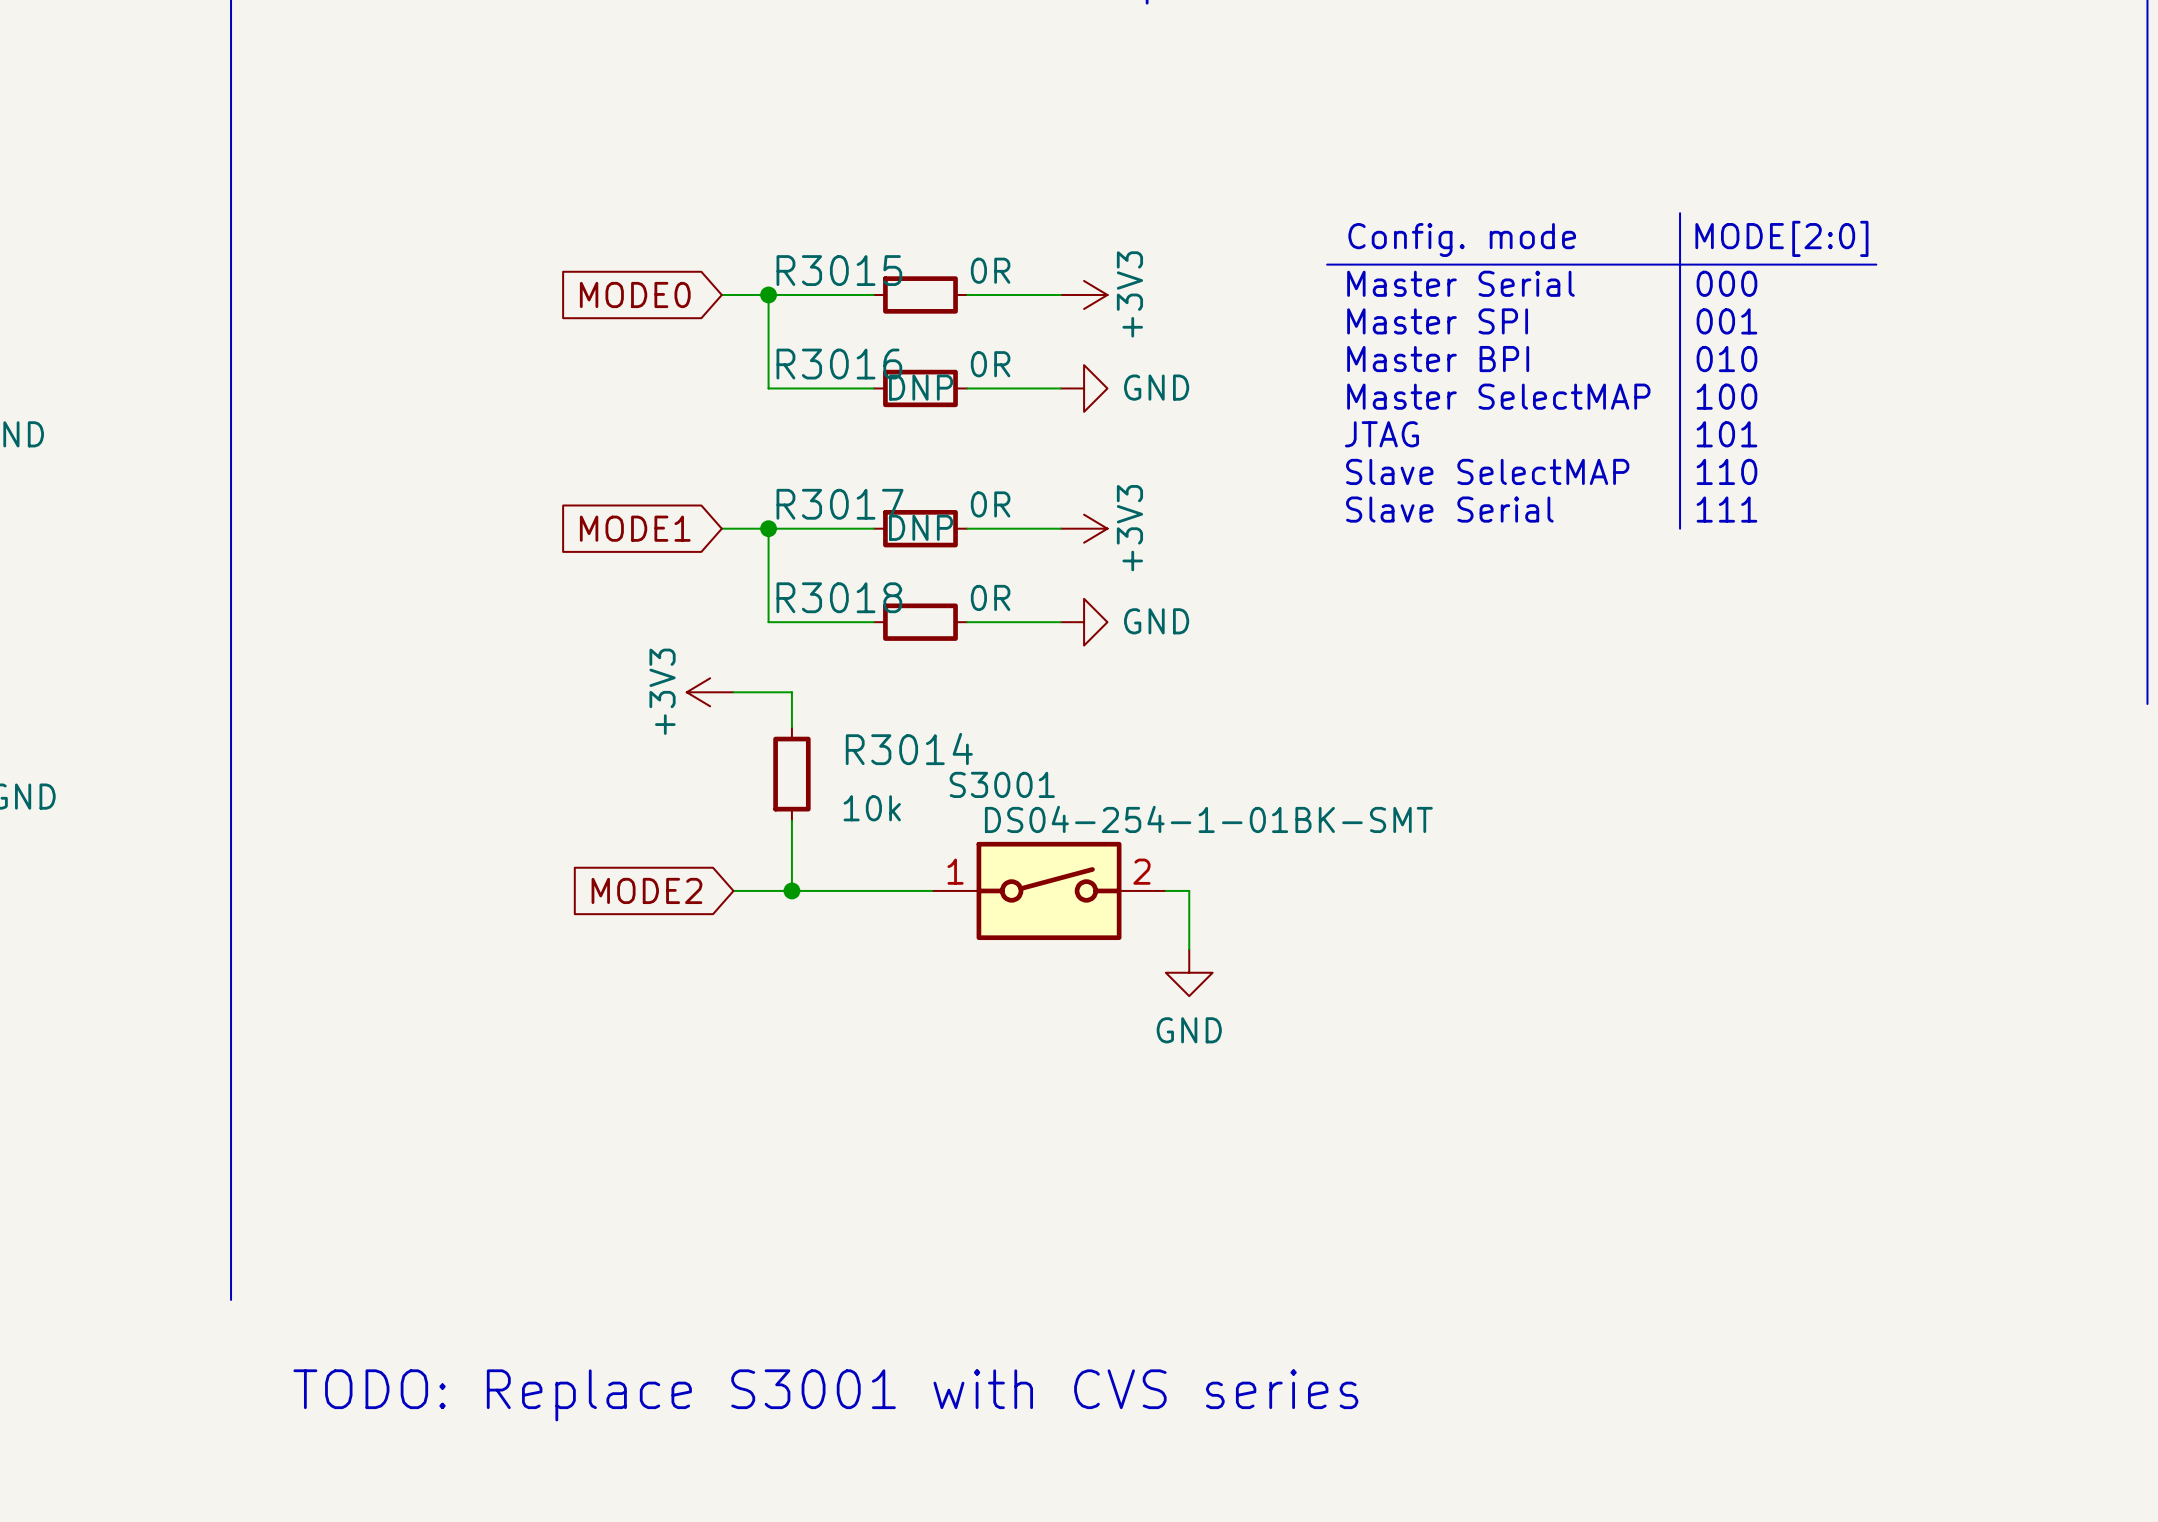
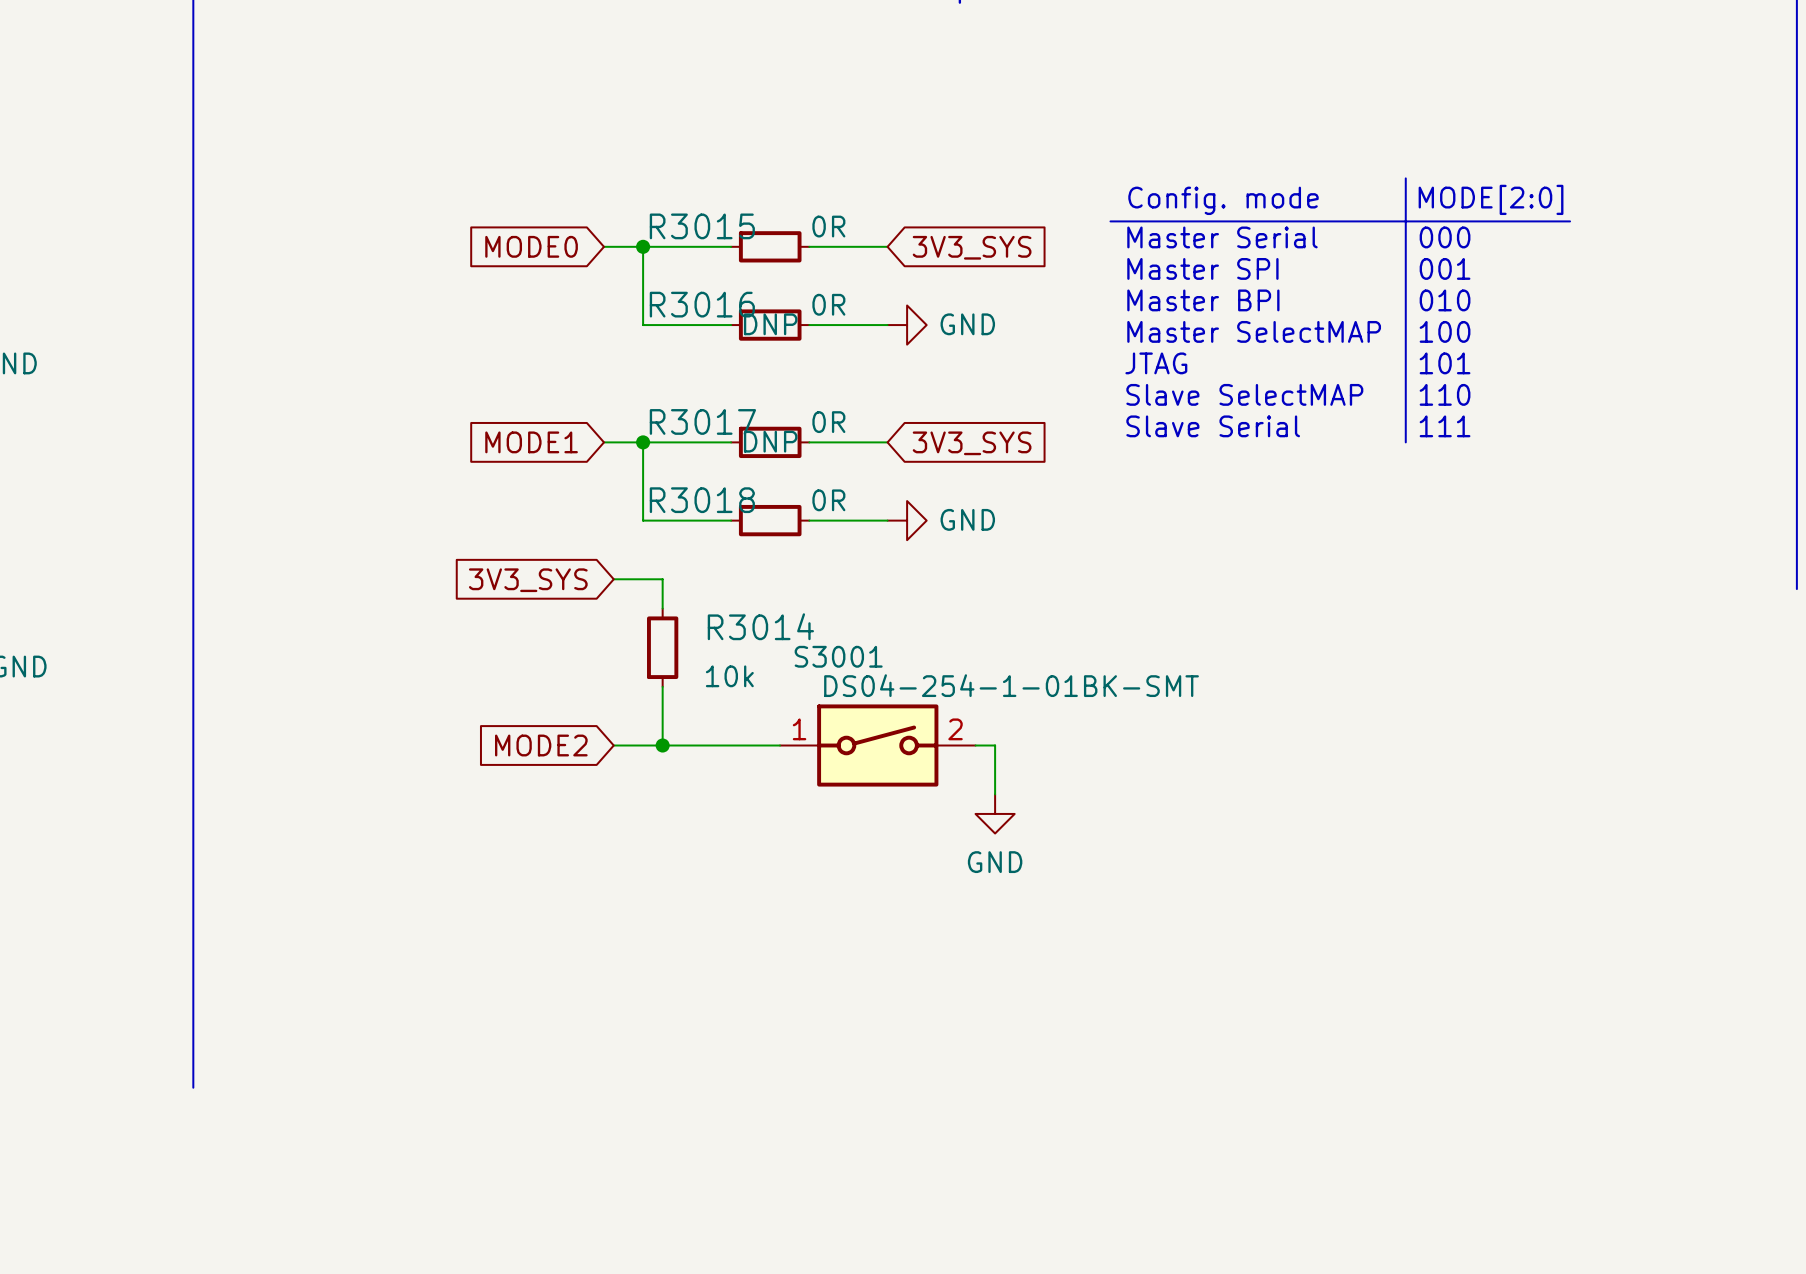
power symbol: +3V3 (1084, 294) -> none
global label: none -> 3V3_SYS (972, 247)
power symbol: +3V3 (1084, 528) -> none
global label: none -> 3V3_SYS (972, 443)
power symbol: +3V3 (710, 692) -> none
global label: none -> 3V3_SYS (528, 580)
text: TODO: Replace S3001 with CVS series (825, 1395) -> none

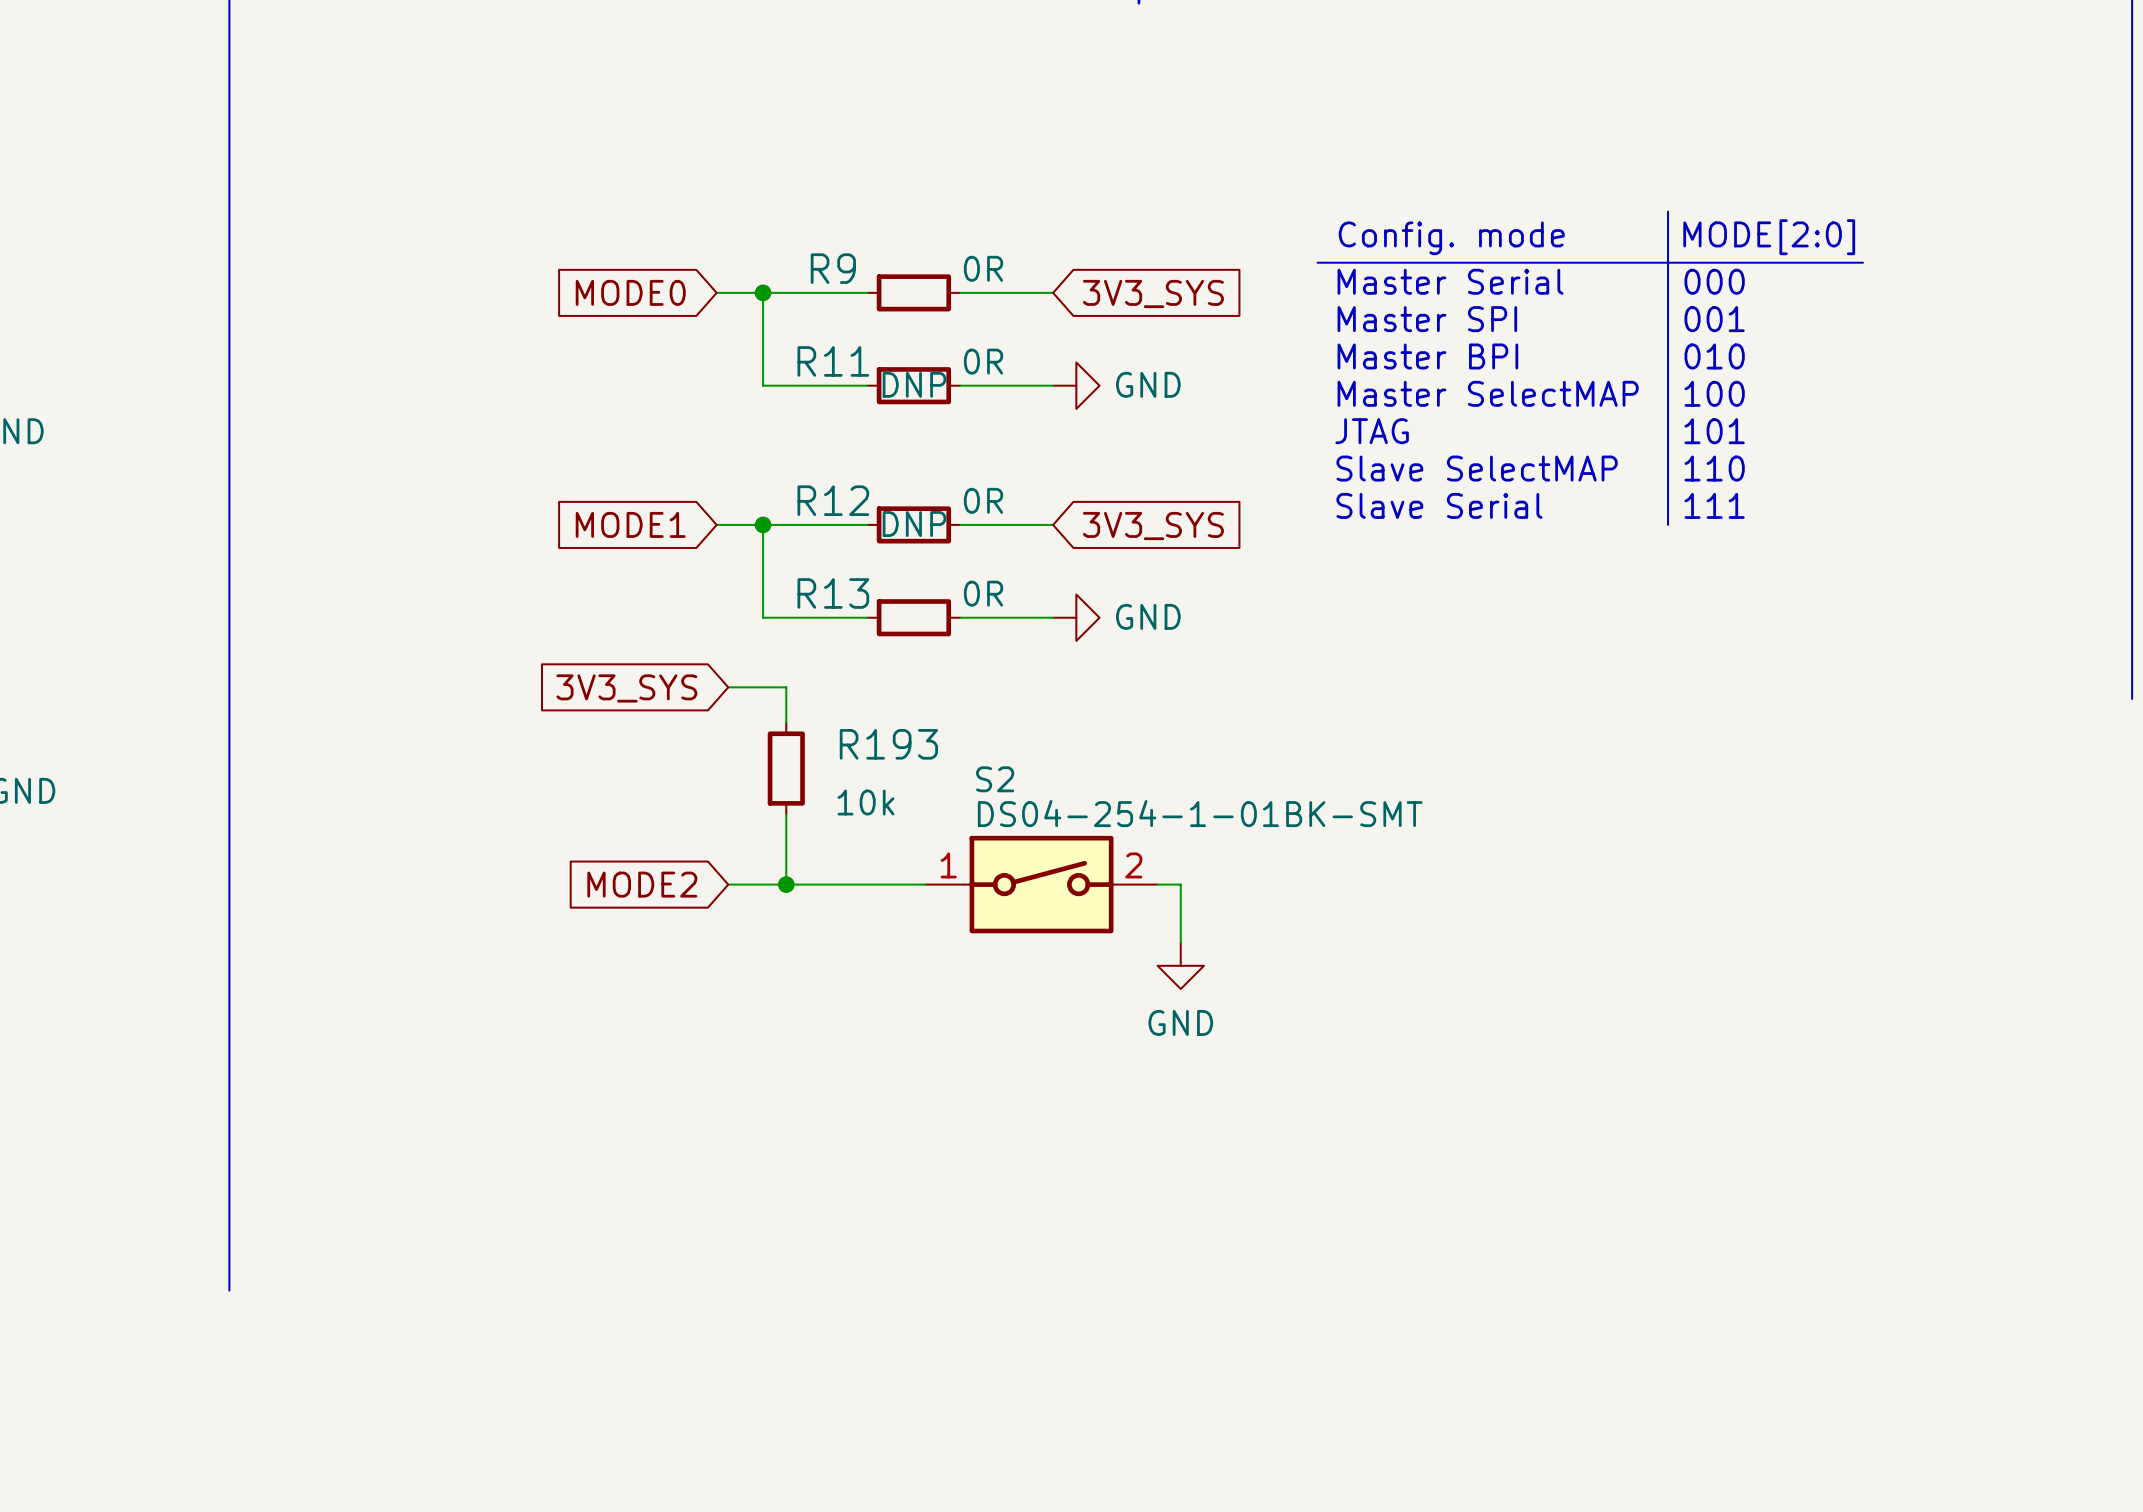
R3015 name: R3015 (702, 226) -> R9 (833, 268)
R3016 name: R3016 (702, 304) -> R11 (833, 361)
R3017 name: R3017 (702, 421) -> R12 (833, 500)
R3018 name: R3018 (702, 500) -> R13 (833, 593)
R3014 name: R3014 (760, 626) -> R193 (888, 744)
S3001 name: S3001 (838, 656) -> S2 (995, 779)

